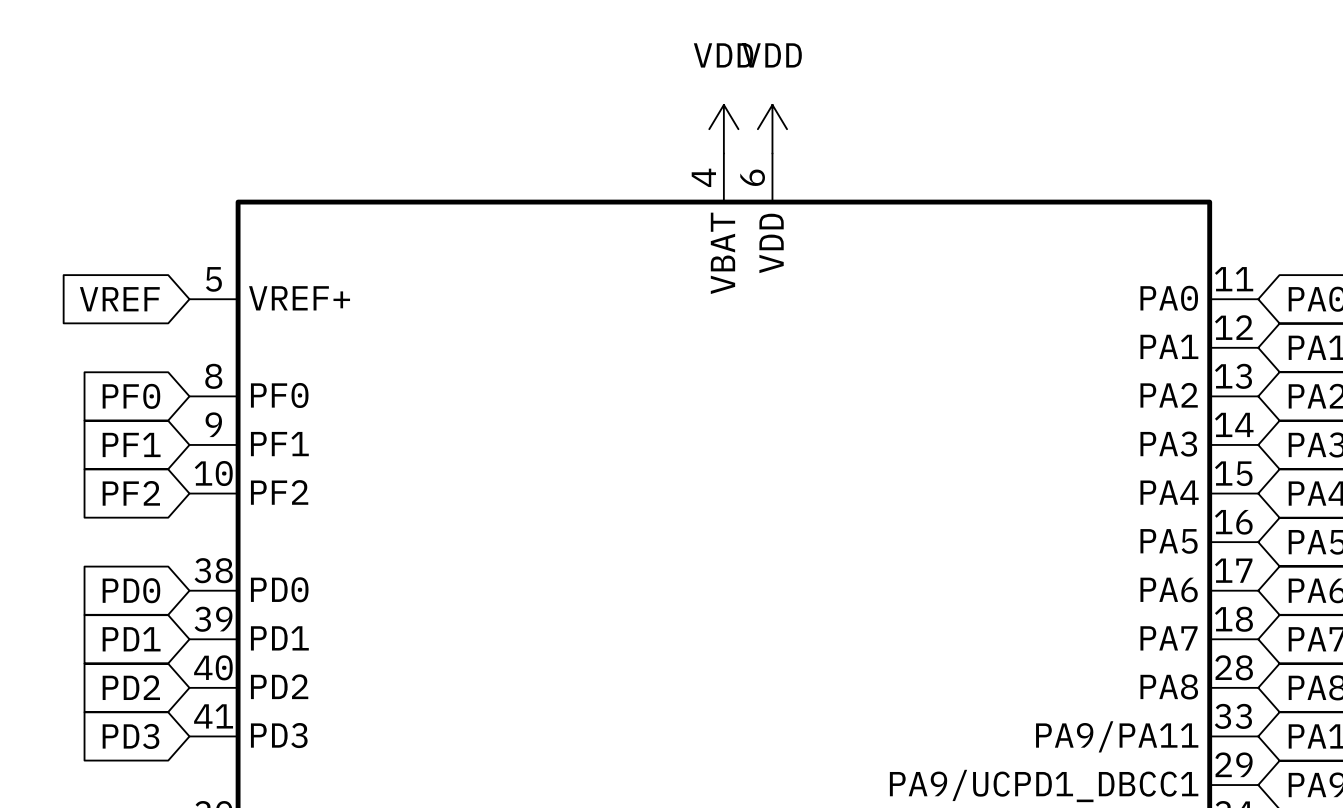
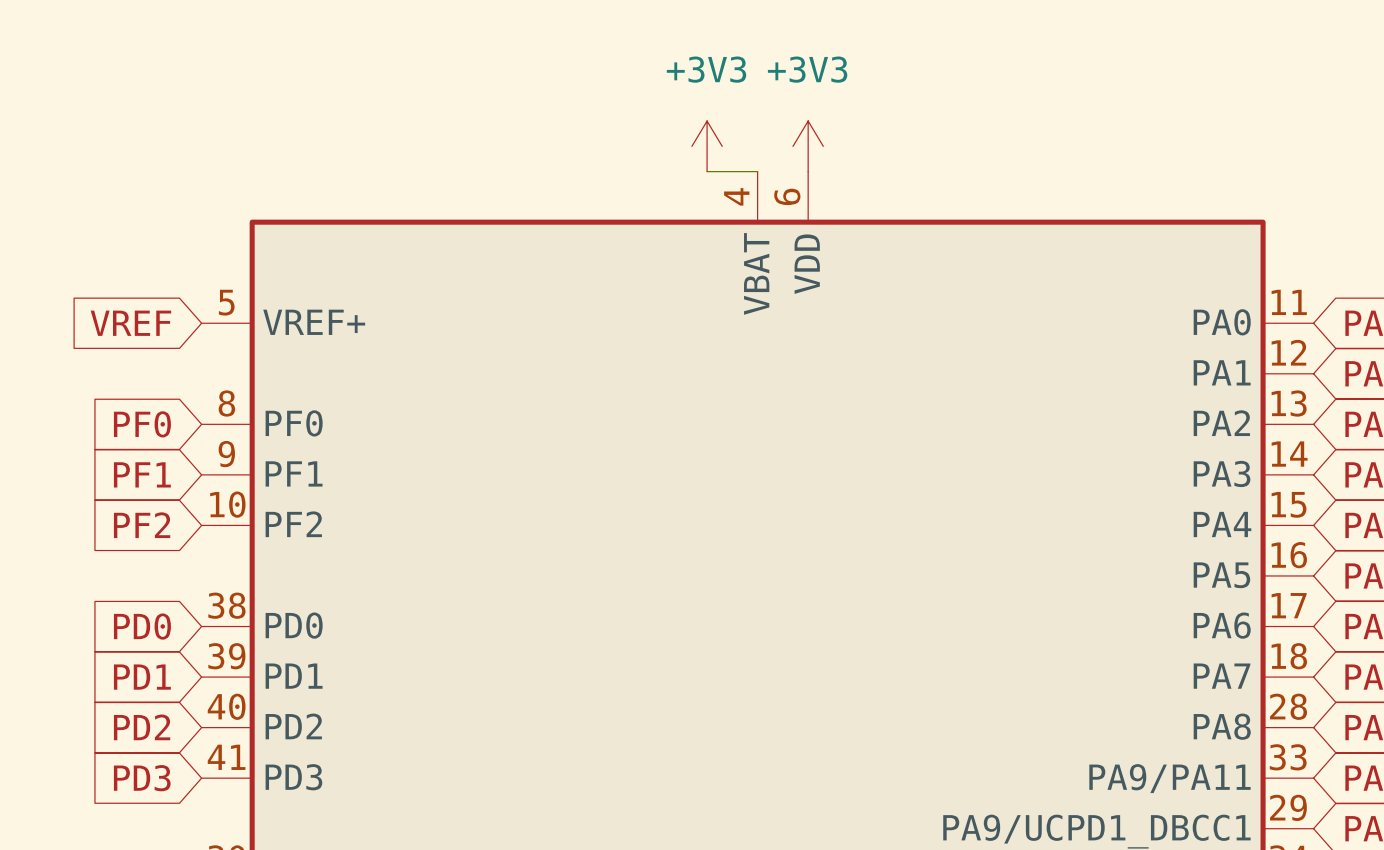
power symbol: none -> +3V3 (707, 146)
power symbol: VDD (723, 129) -> none
power symbol: VDD (772, 129) -> +3V3 (808, 146)
wire: none -> (707, 171) (757, 171)

